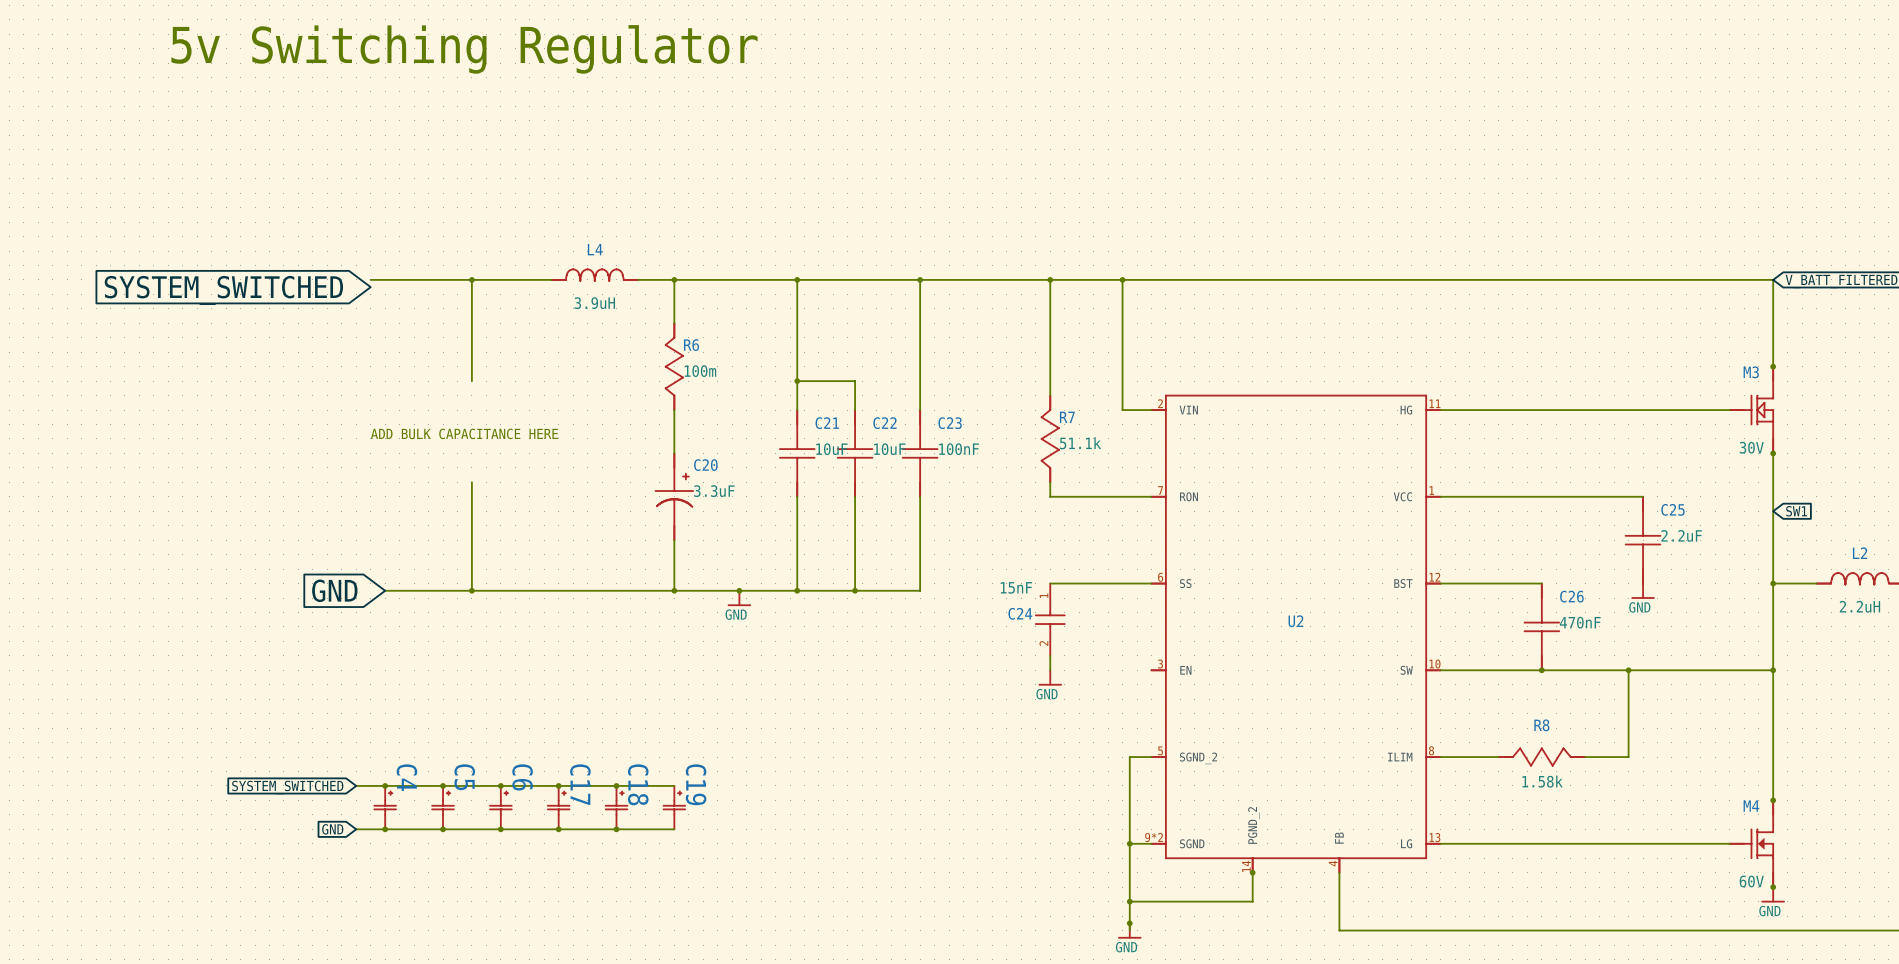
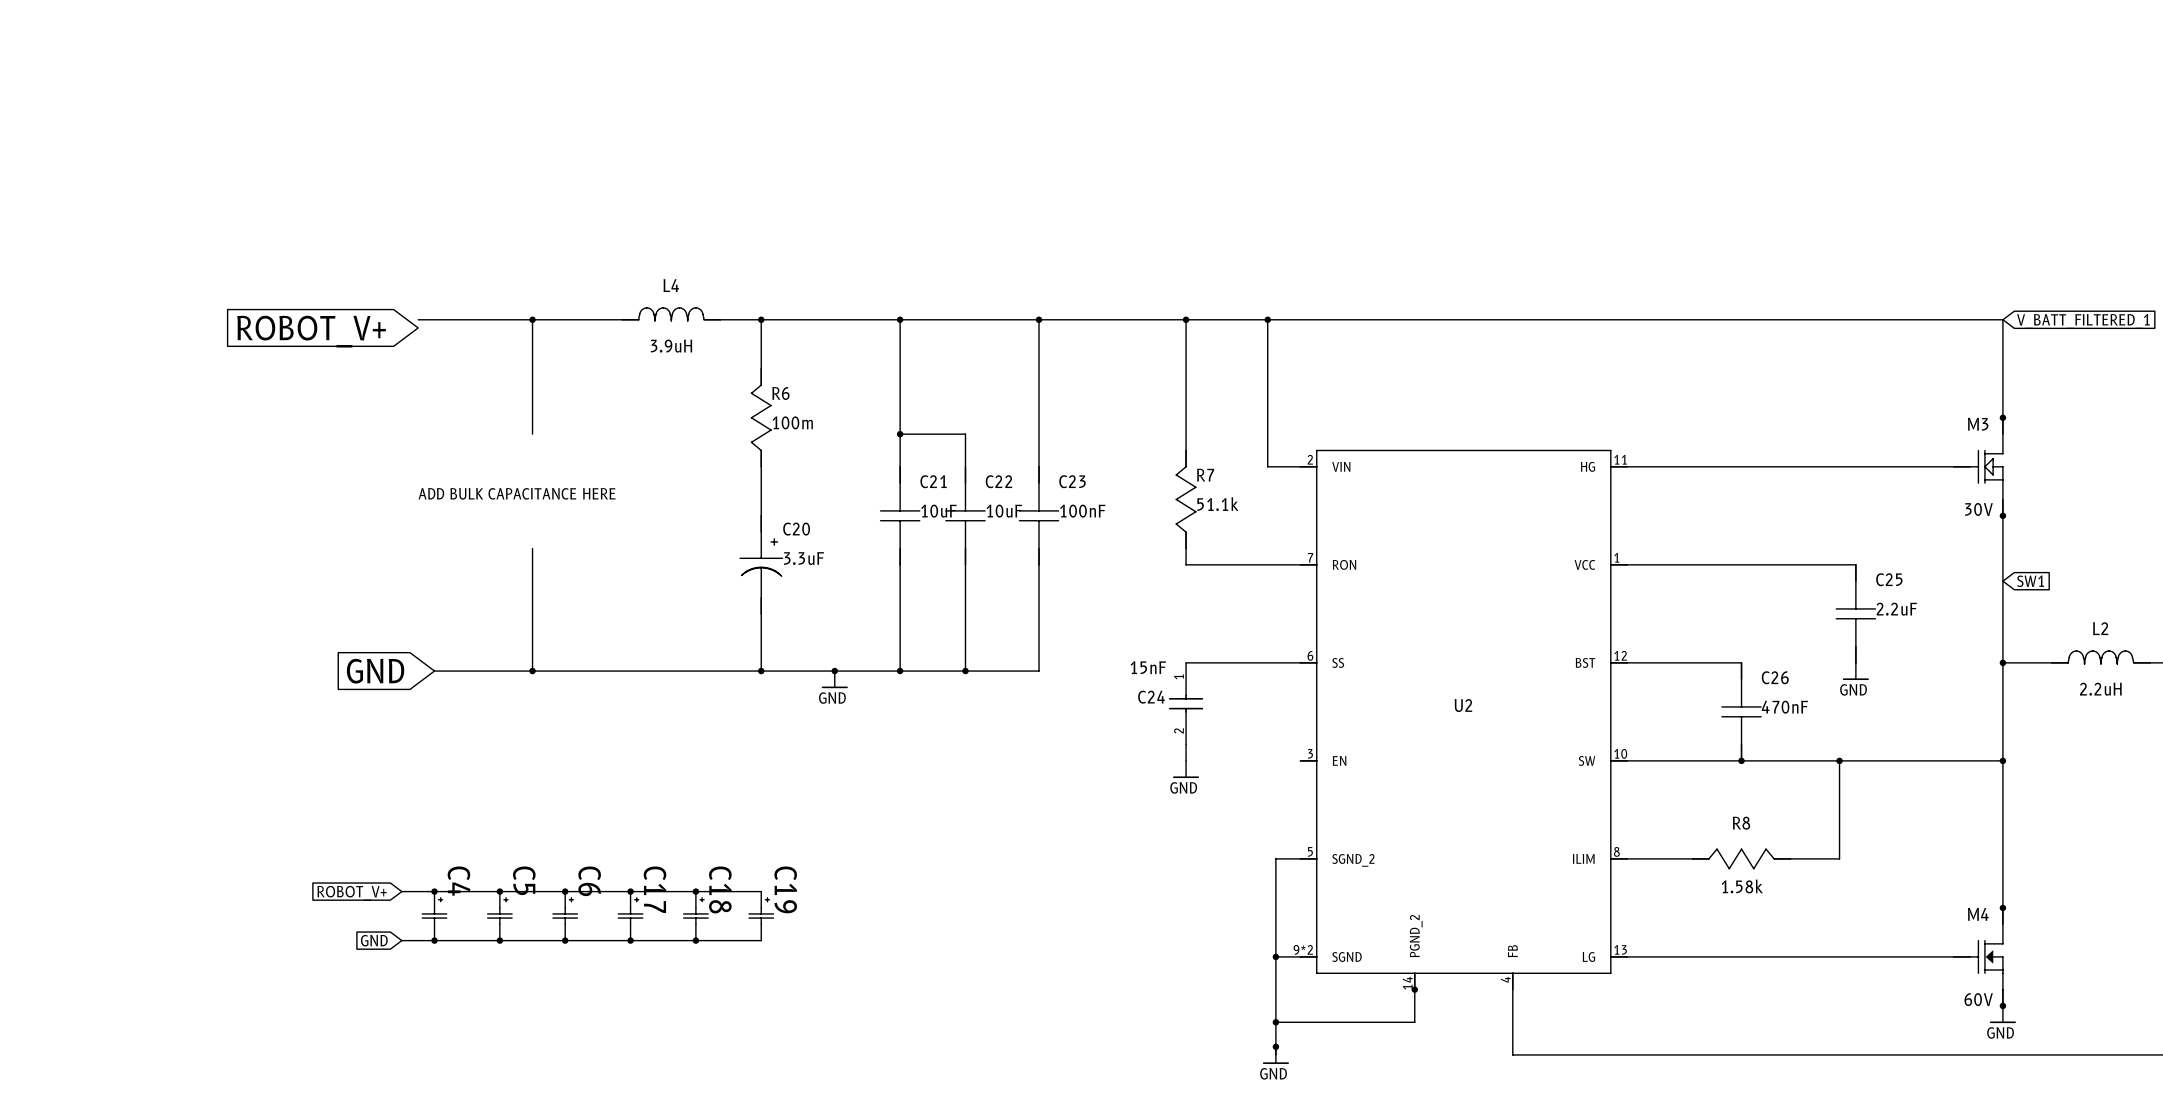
text: 5v Switching Regulator (464, 49) -> none
global label: SYSTEM_SWITCHED (223, 290) -> ROBOT_V+ (311, 331)
global label: SYSTEM_SWITCHED (287, 787) -> ROBOT_V+ (352, 893)

